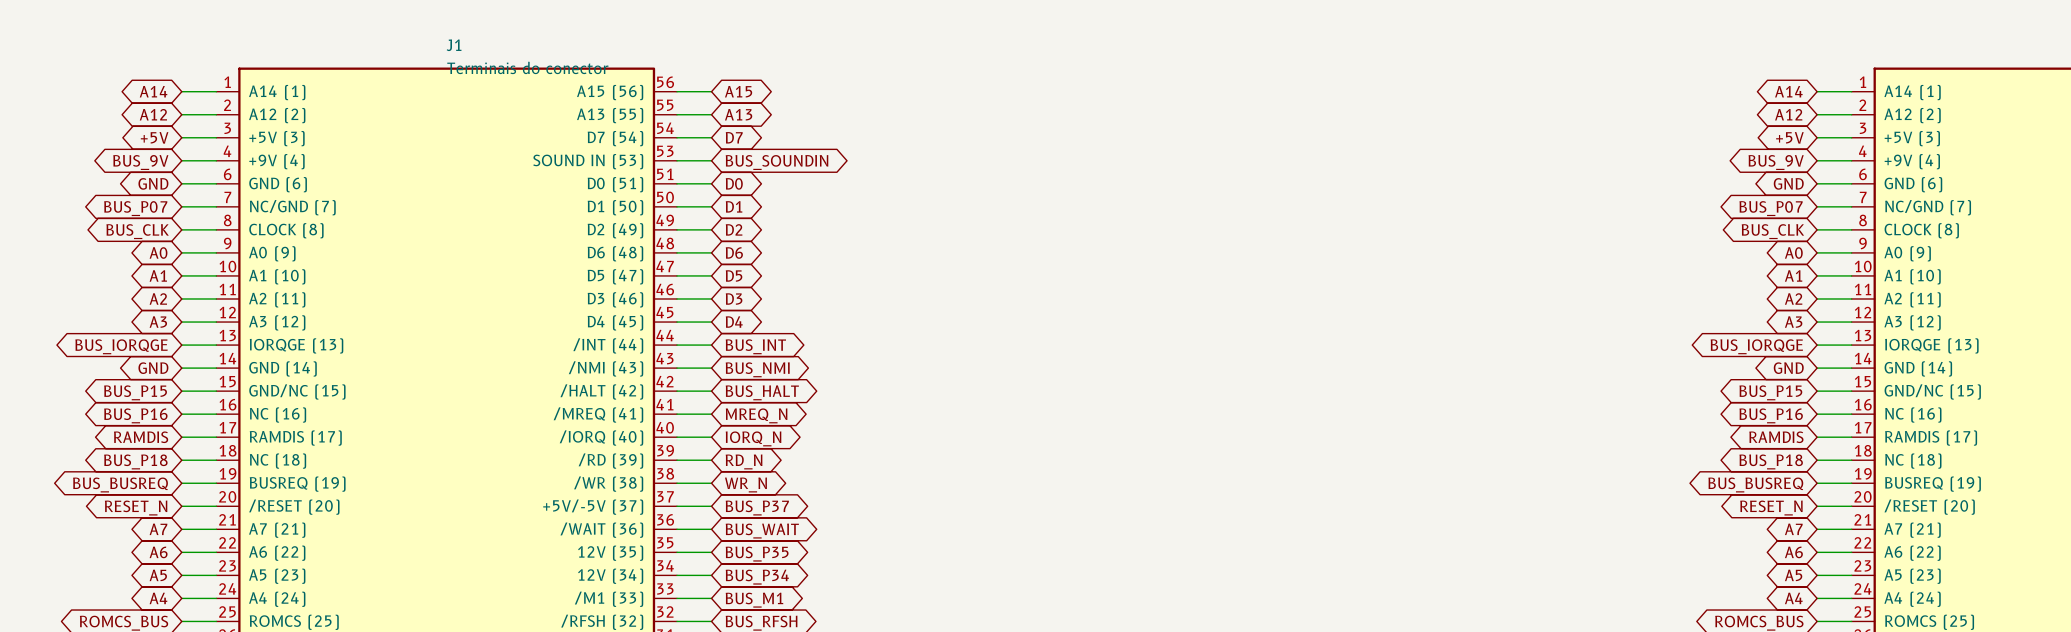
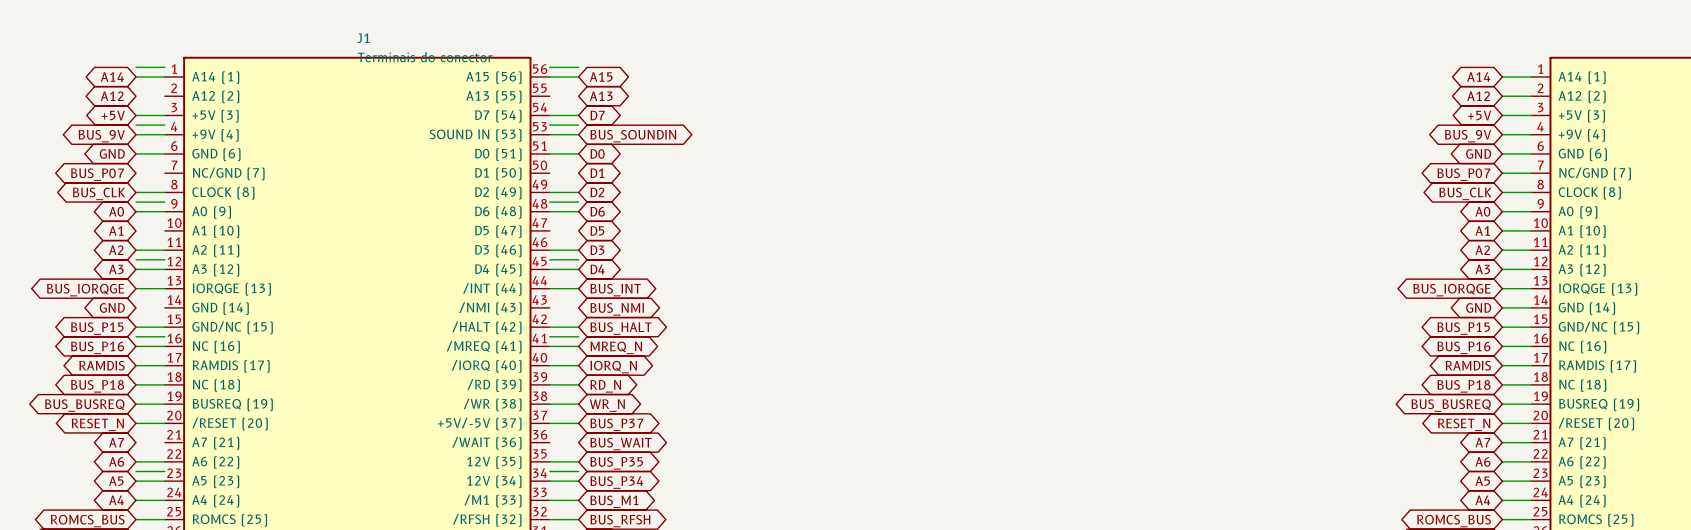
wire: none -> (136, 67) (164, 67)
wire: none -> (549, 67) (578, 67)
wire: (181, 114) (216, 114) -> (136, 125) (164, 125)
wire: (677, 114) (711, 114) -> (549, 125) (578, 125)
wire: (181, 206) (216, 206) -> (136, 202) (164, 202)
wire: (677, 206) (711, 206) -> (549, 202) (578, 202)
wire: (181, 275) (216, 275) -> (136, 259) (164, 259)
wire: (677, 275) (711, 275) -> (549, 259) (578, 259)
wire: (181, 368) (216, 368) -> (136, 336) (164, 336)
wire: (677, 368) (711, 368) -> (549, 336) (578, 336)
wire: (181, 529) (216, 529) -> (136, 471) (164, 471)
wire: (677, 529) (711, 529) -> (549, 471) (578, 471)

